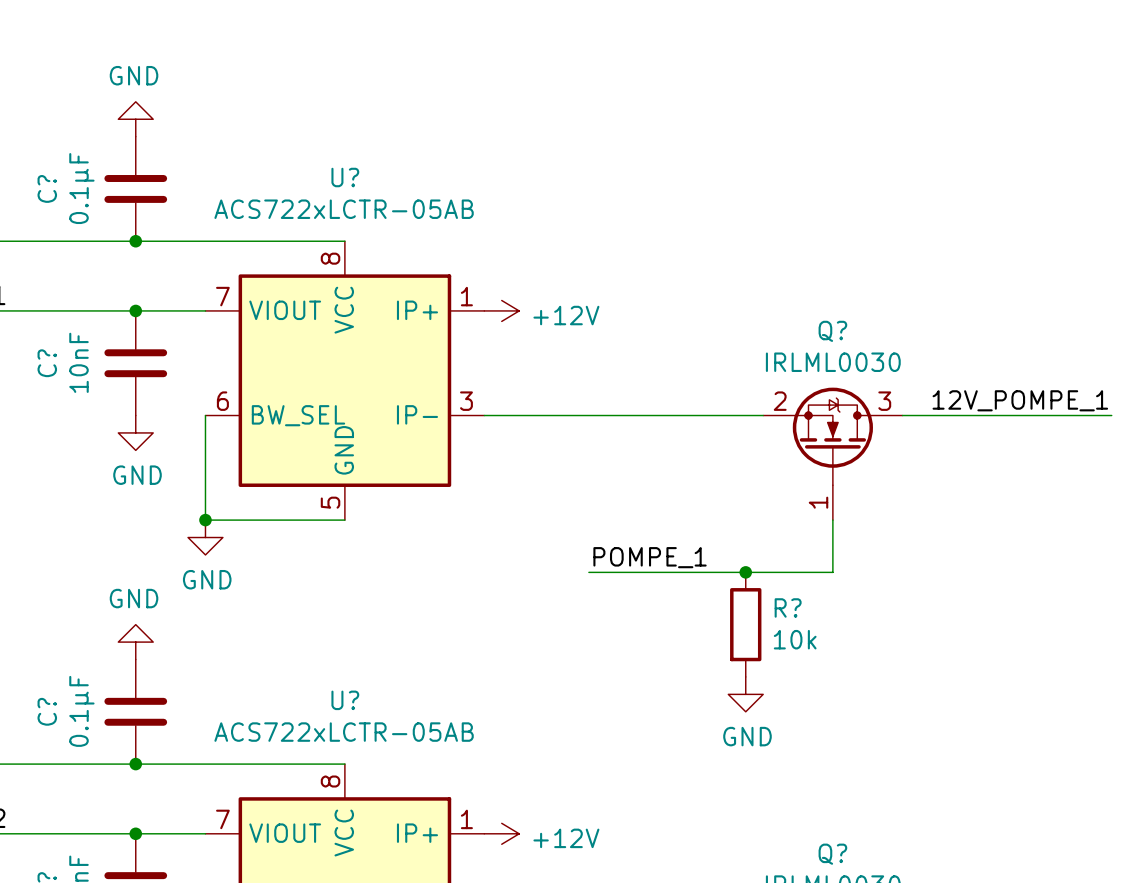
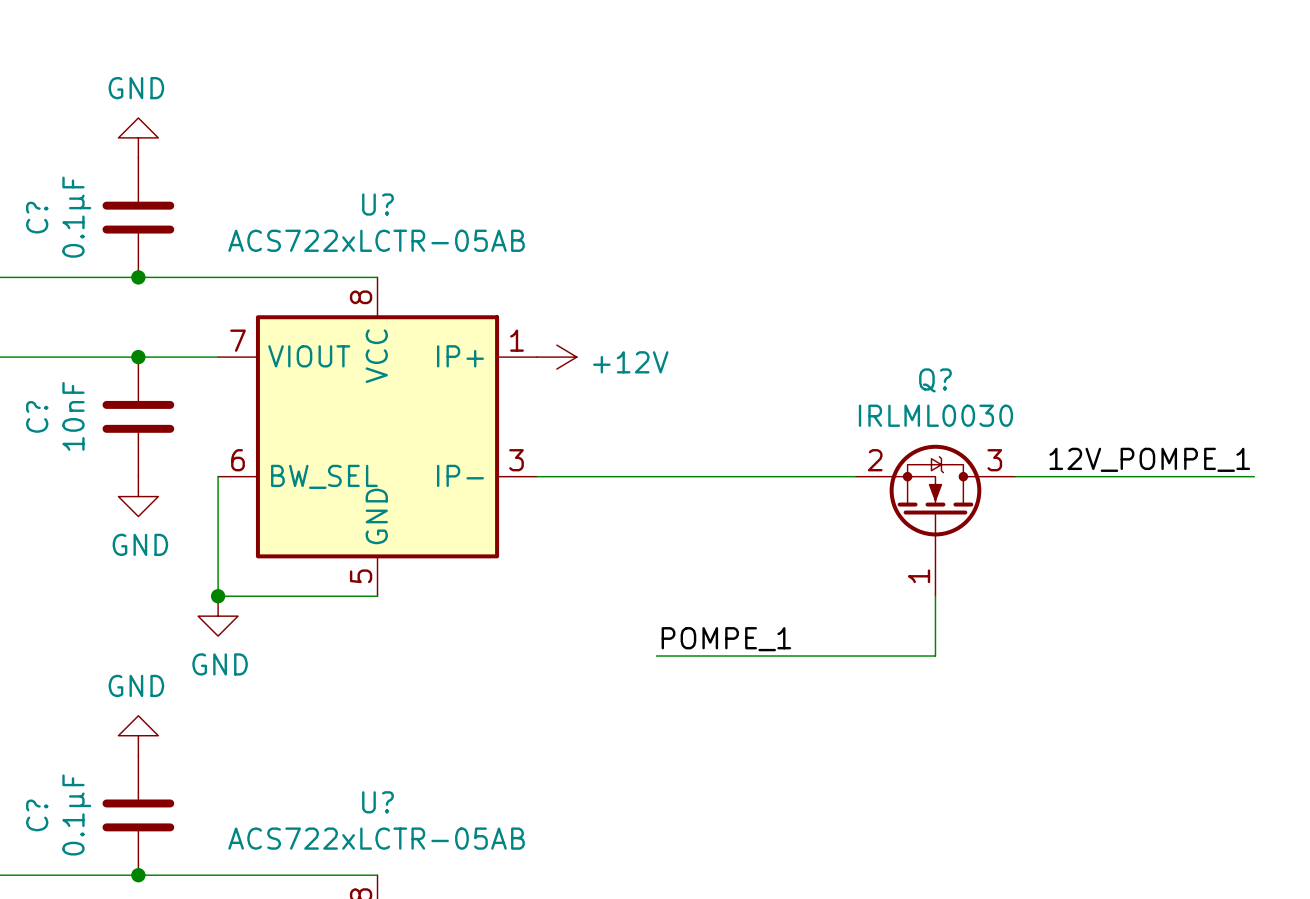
junction: (745, 572) -> none
R?: 10k (745, 624) -> none
power symbol: GND (745, 694) -> none

